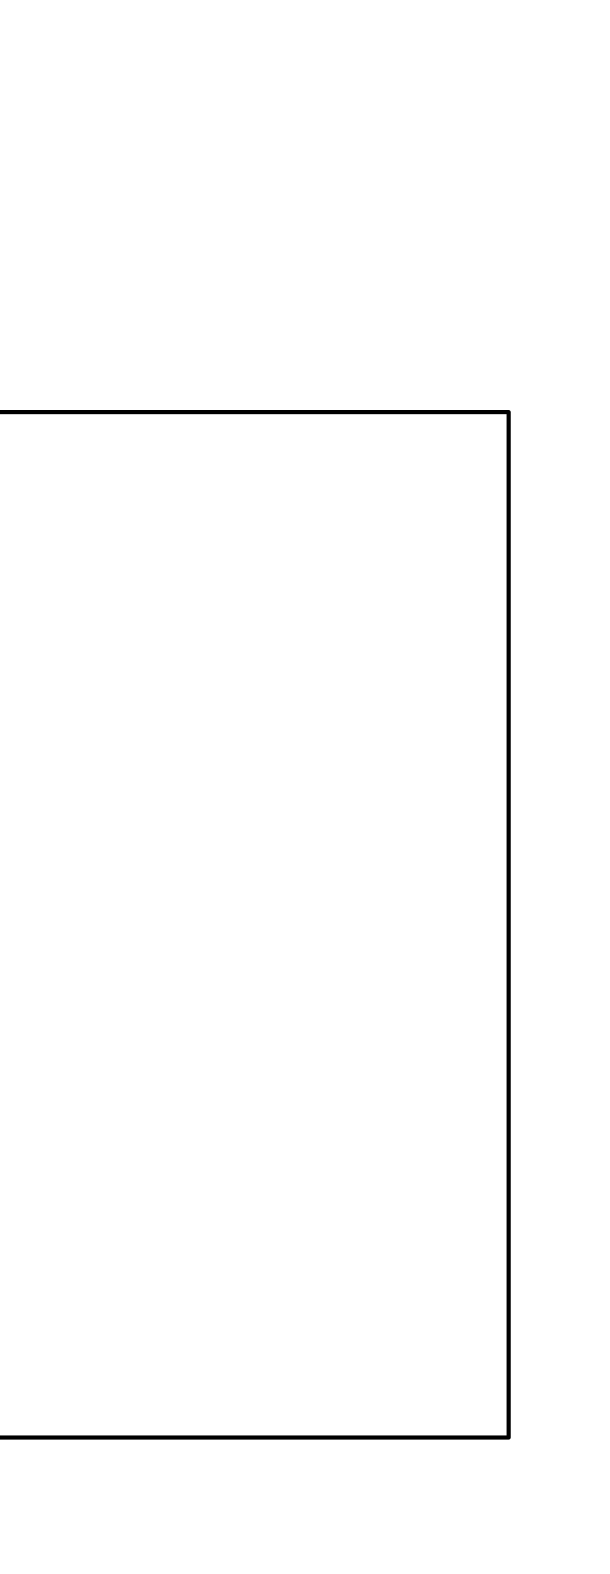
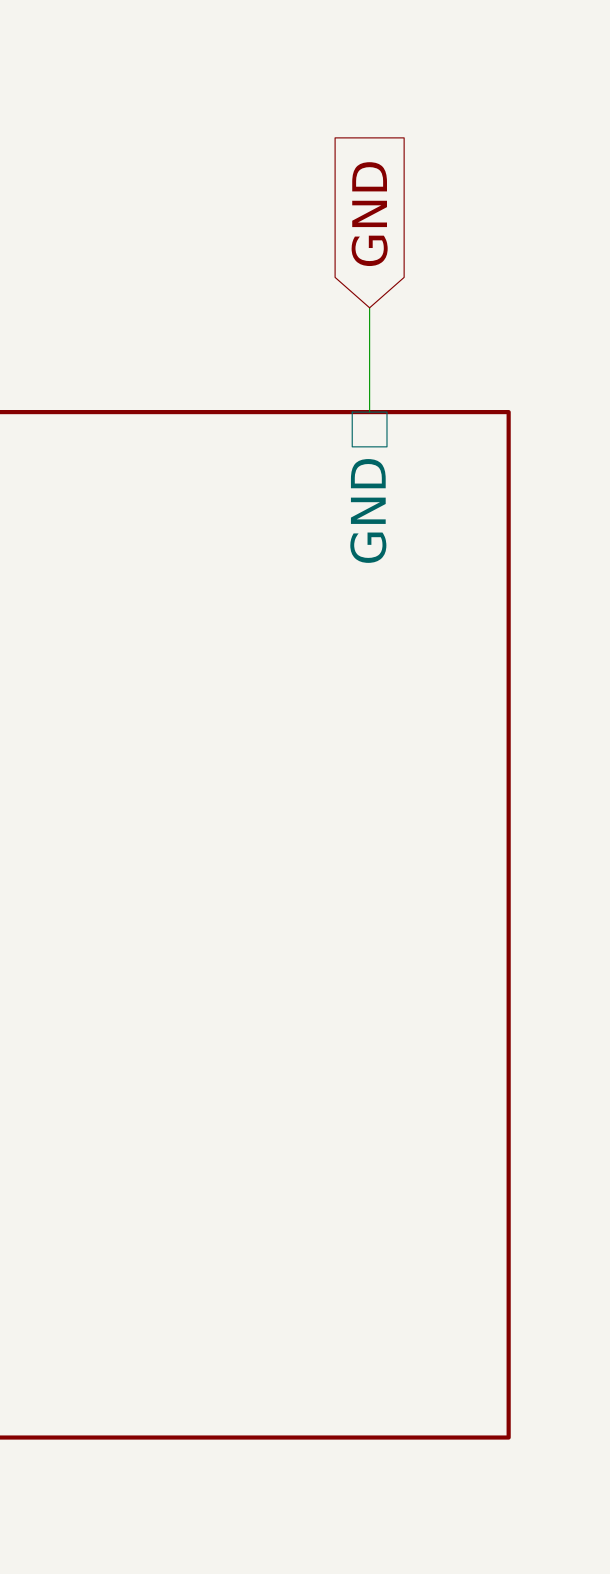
global label: none -> GND (369, 214)
wire: none -> (369, 307) (369, 412)
sheet pin: none -> GND (368, 510)

